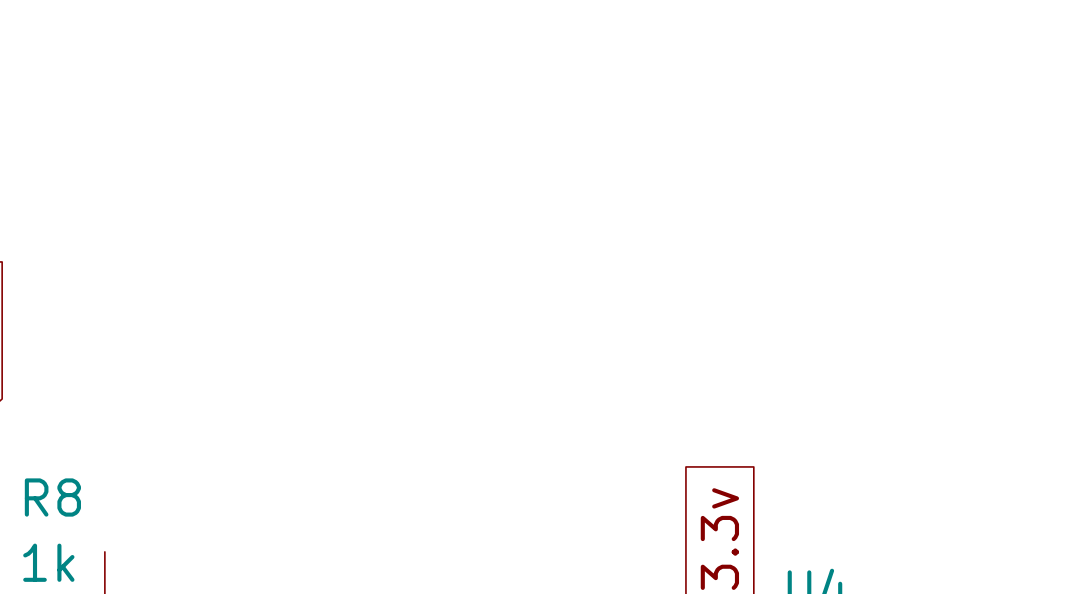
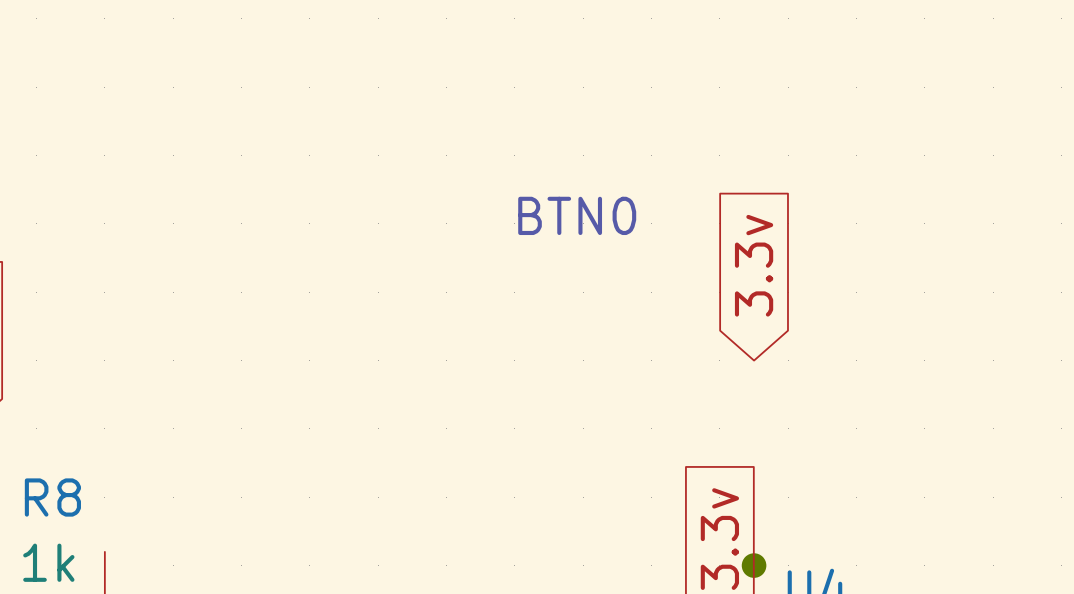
text: none -> BTN0 (577, 215)
global label: none -> 3.3v (754, 265)
junction: none -> (754, 565)

